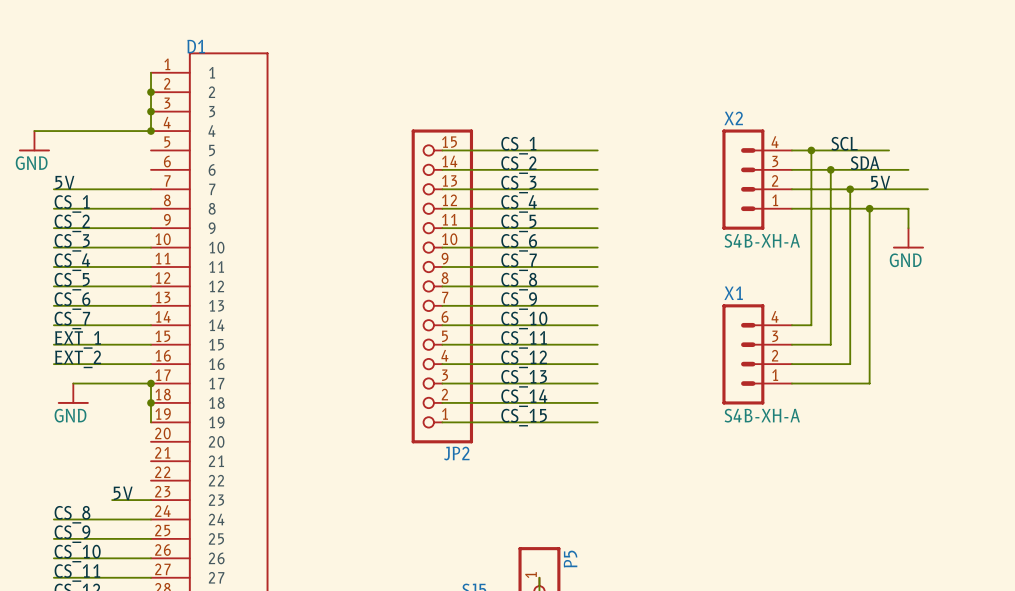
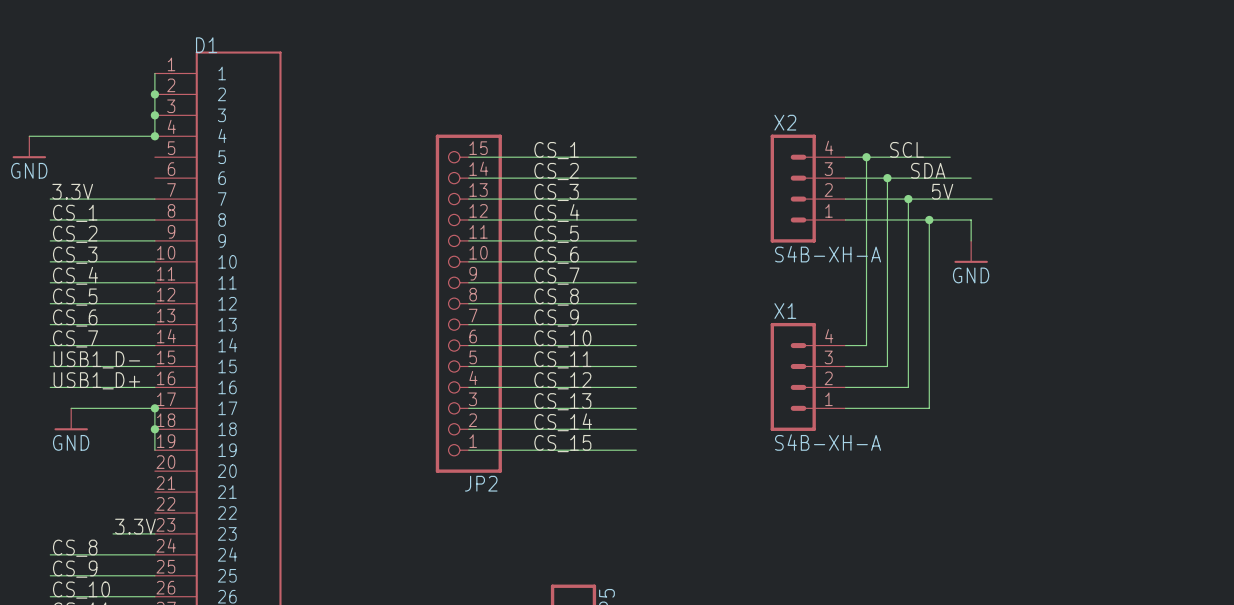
label: 5V (64, 182) -> 3.3V (72, 191)
label: EXT_1 (78, 339) -> USB1_D- (96, 359)
label: EXT_2 (78, 359) -> USB1_D+ (96, 380)
label: 5V (123, 493) -> 3.3V (135, 526)

